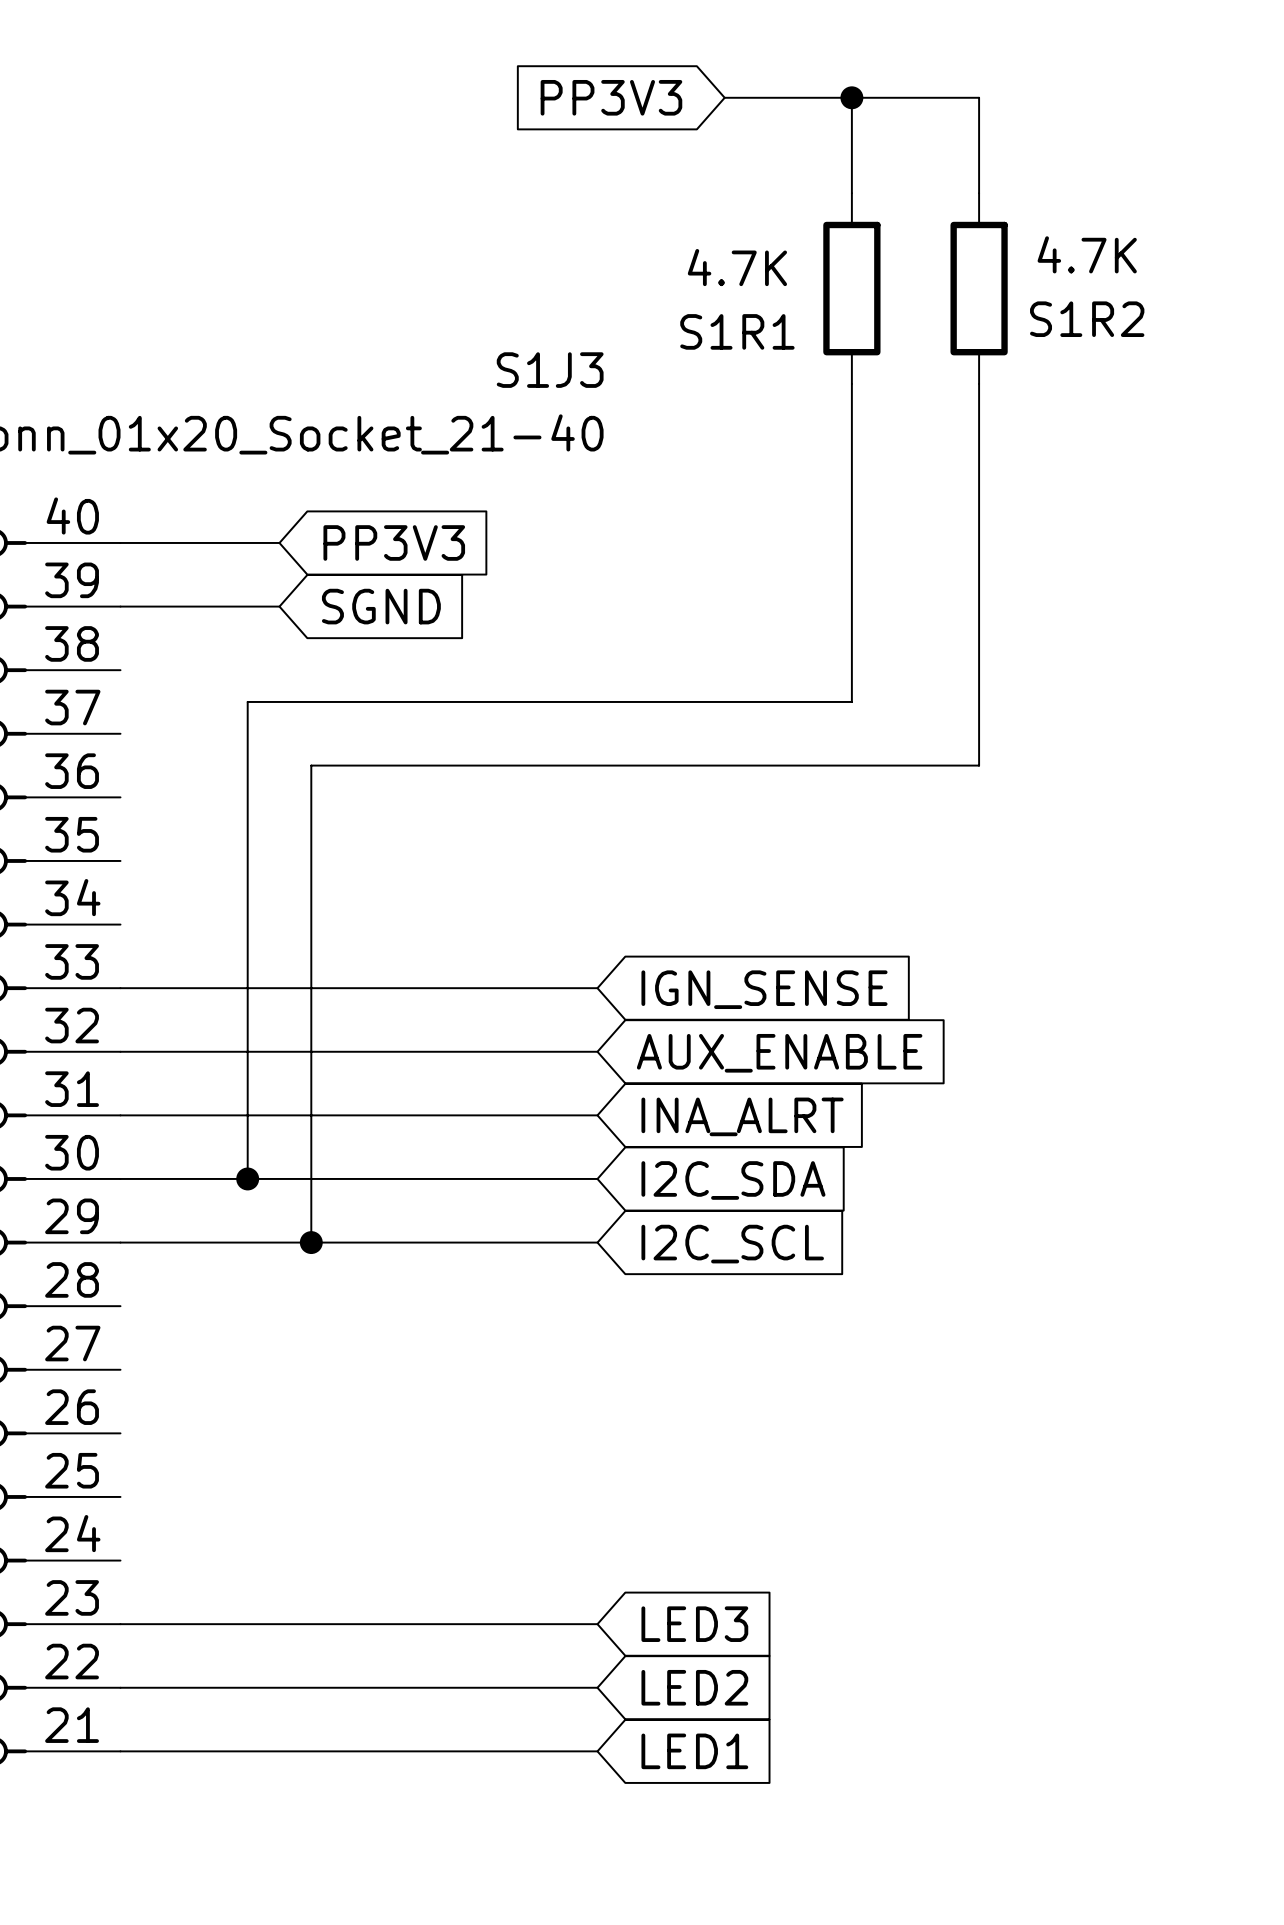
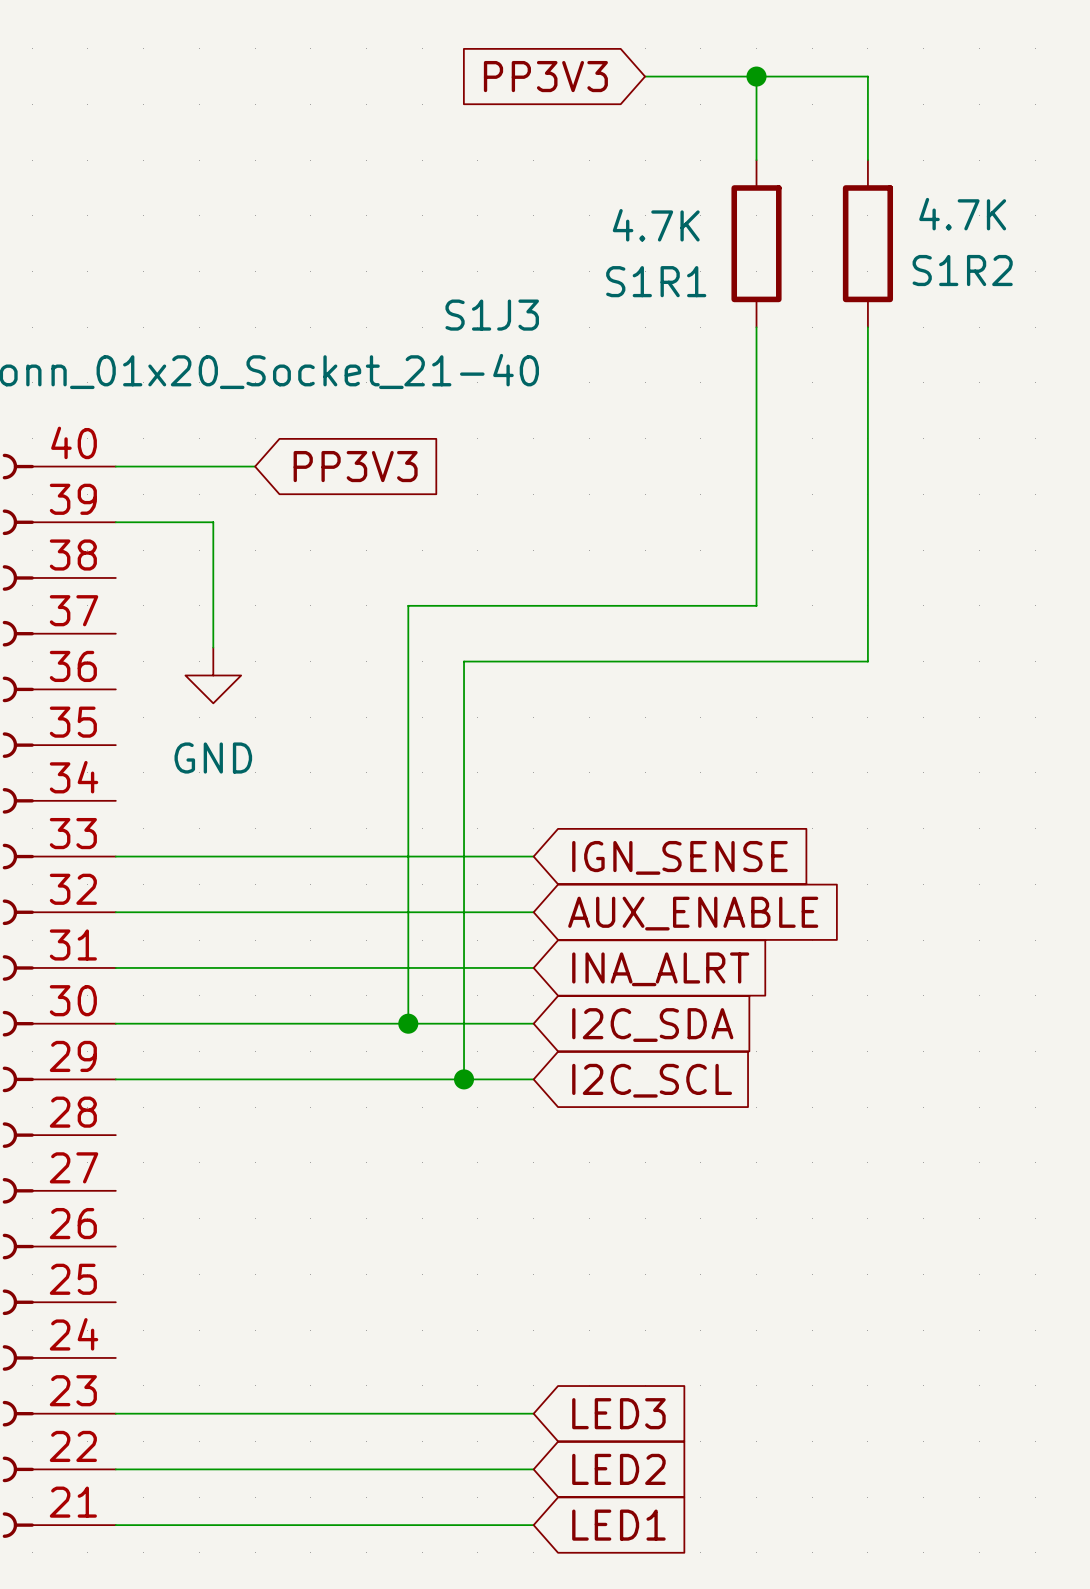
wire: (231, 606) (279, 606) -> (213, 522) (213, 647)
global label: SGND (381, 606) -> none
wire: (454, 701) (247, 701) (247, 1178) -> (408, 605) (408, 1023)
wire: (518, 765) (311, 765) (311, 1242) -> (464, 661) (464, 1079)
power symbol: none -> GND (213, 675)
junction: (247, 1178) -> none
junction: none -> (408, 1023)
junction: (311, 1242) -> none
junction: none -> (464, 1079)

